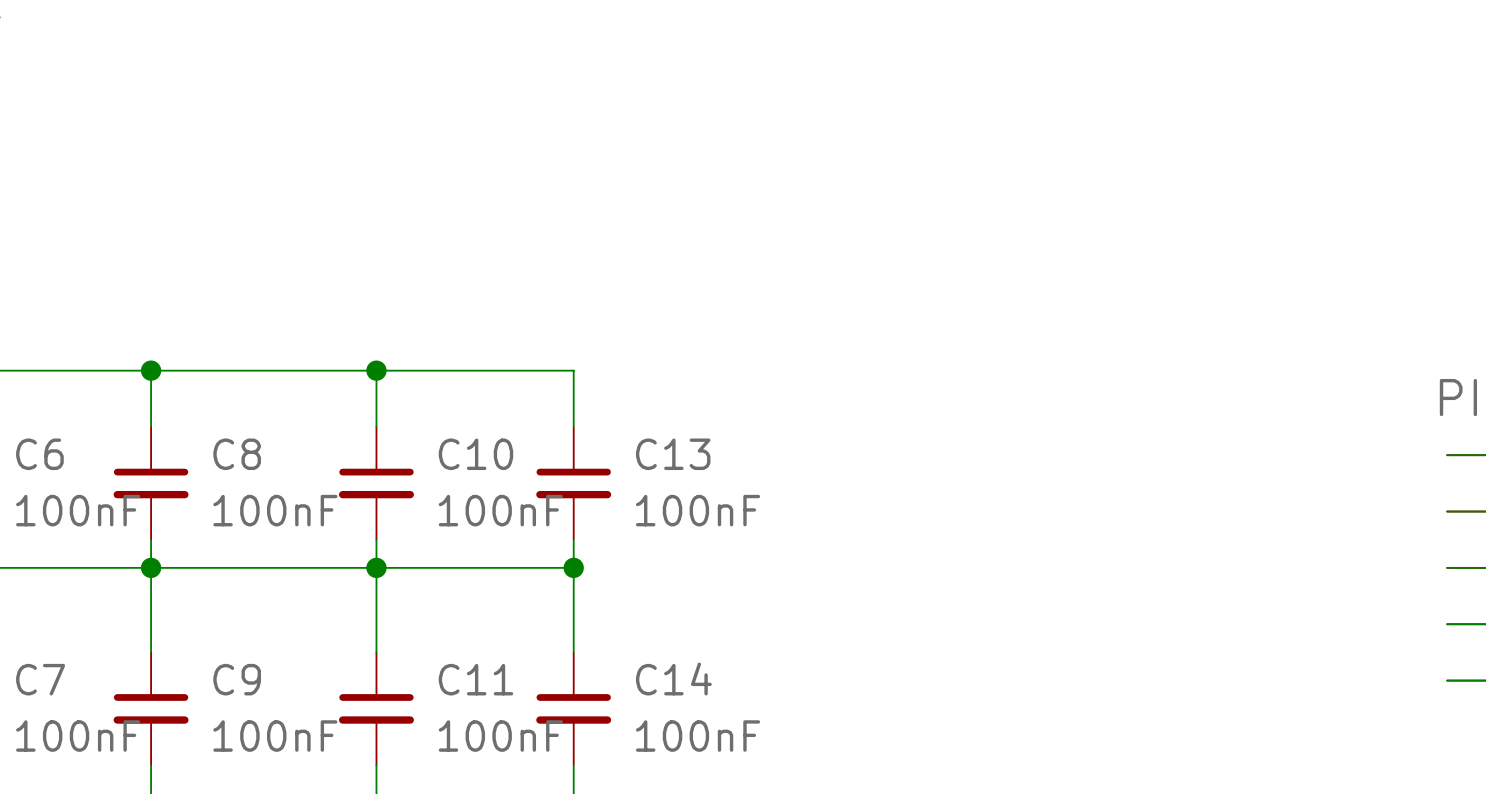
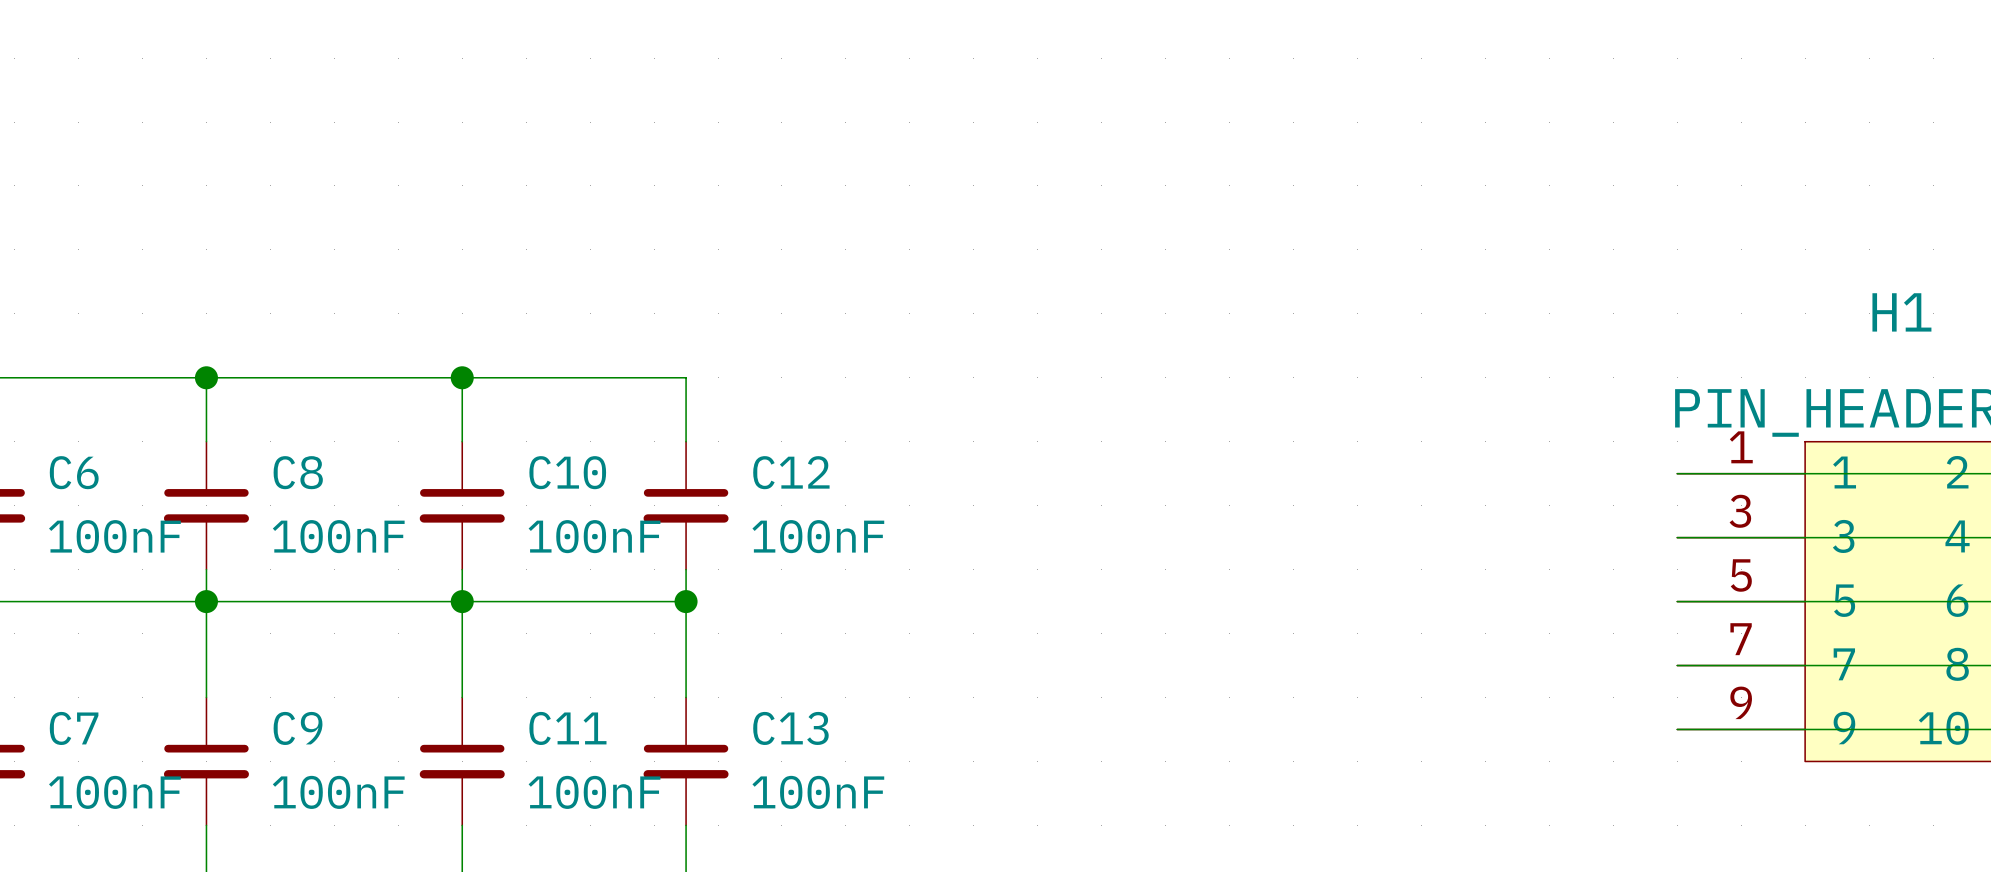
C13 name: C13 (673, 454) -> C12 (791, 472)
C14 name: C14 (673, 679) -> C13 (790, 728)

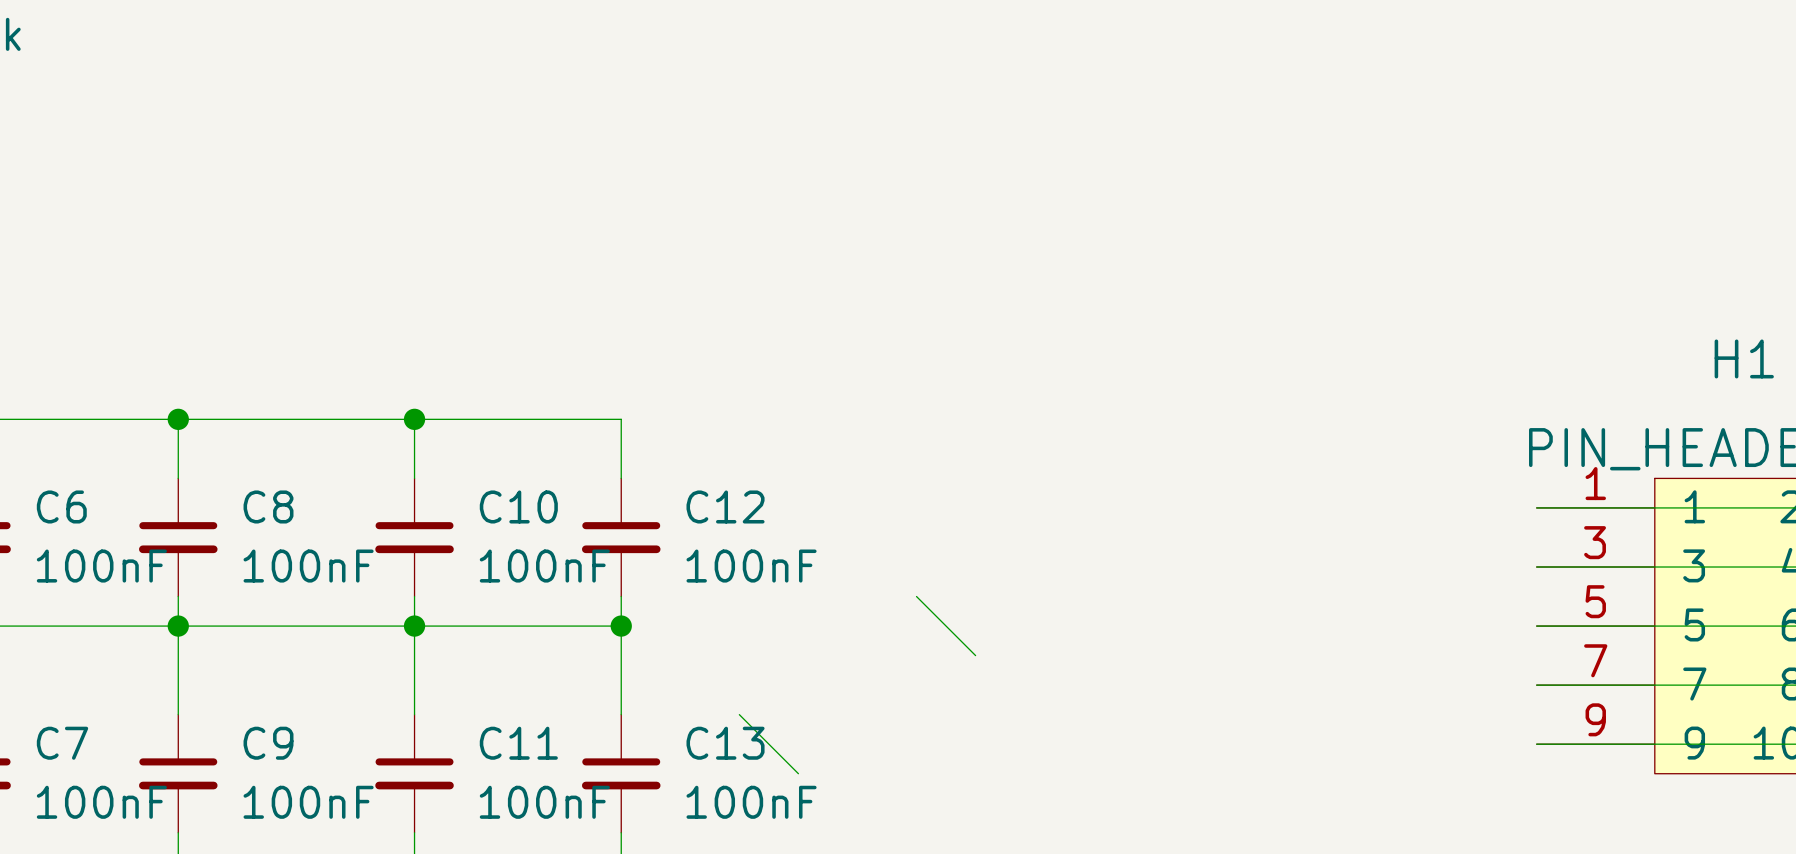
wire: none -> (916, 596) (975, 655)
wire: none -> (739, 714) (798, 773)

